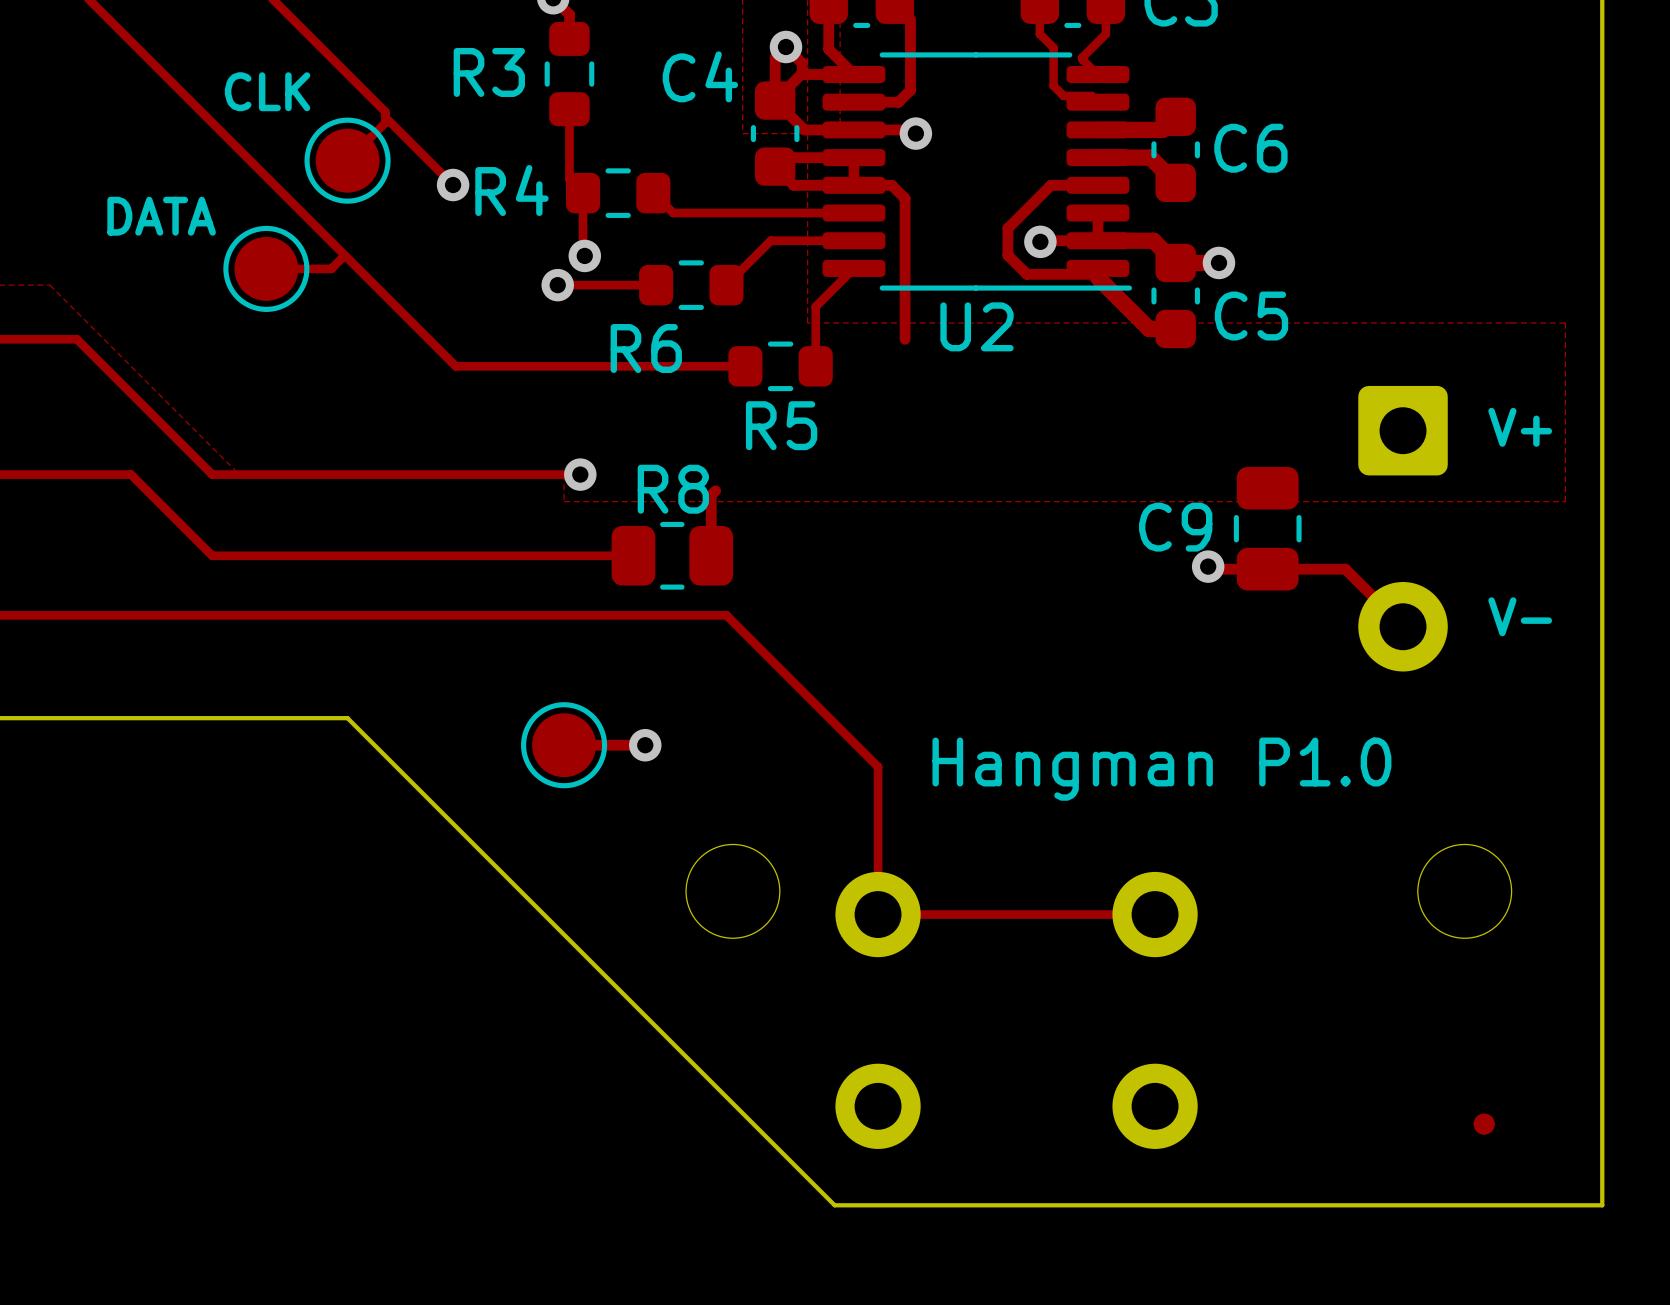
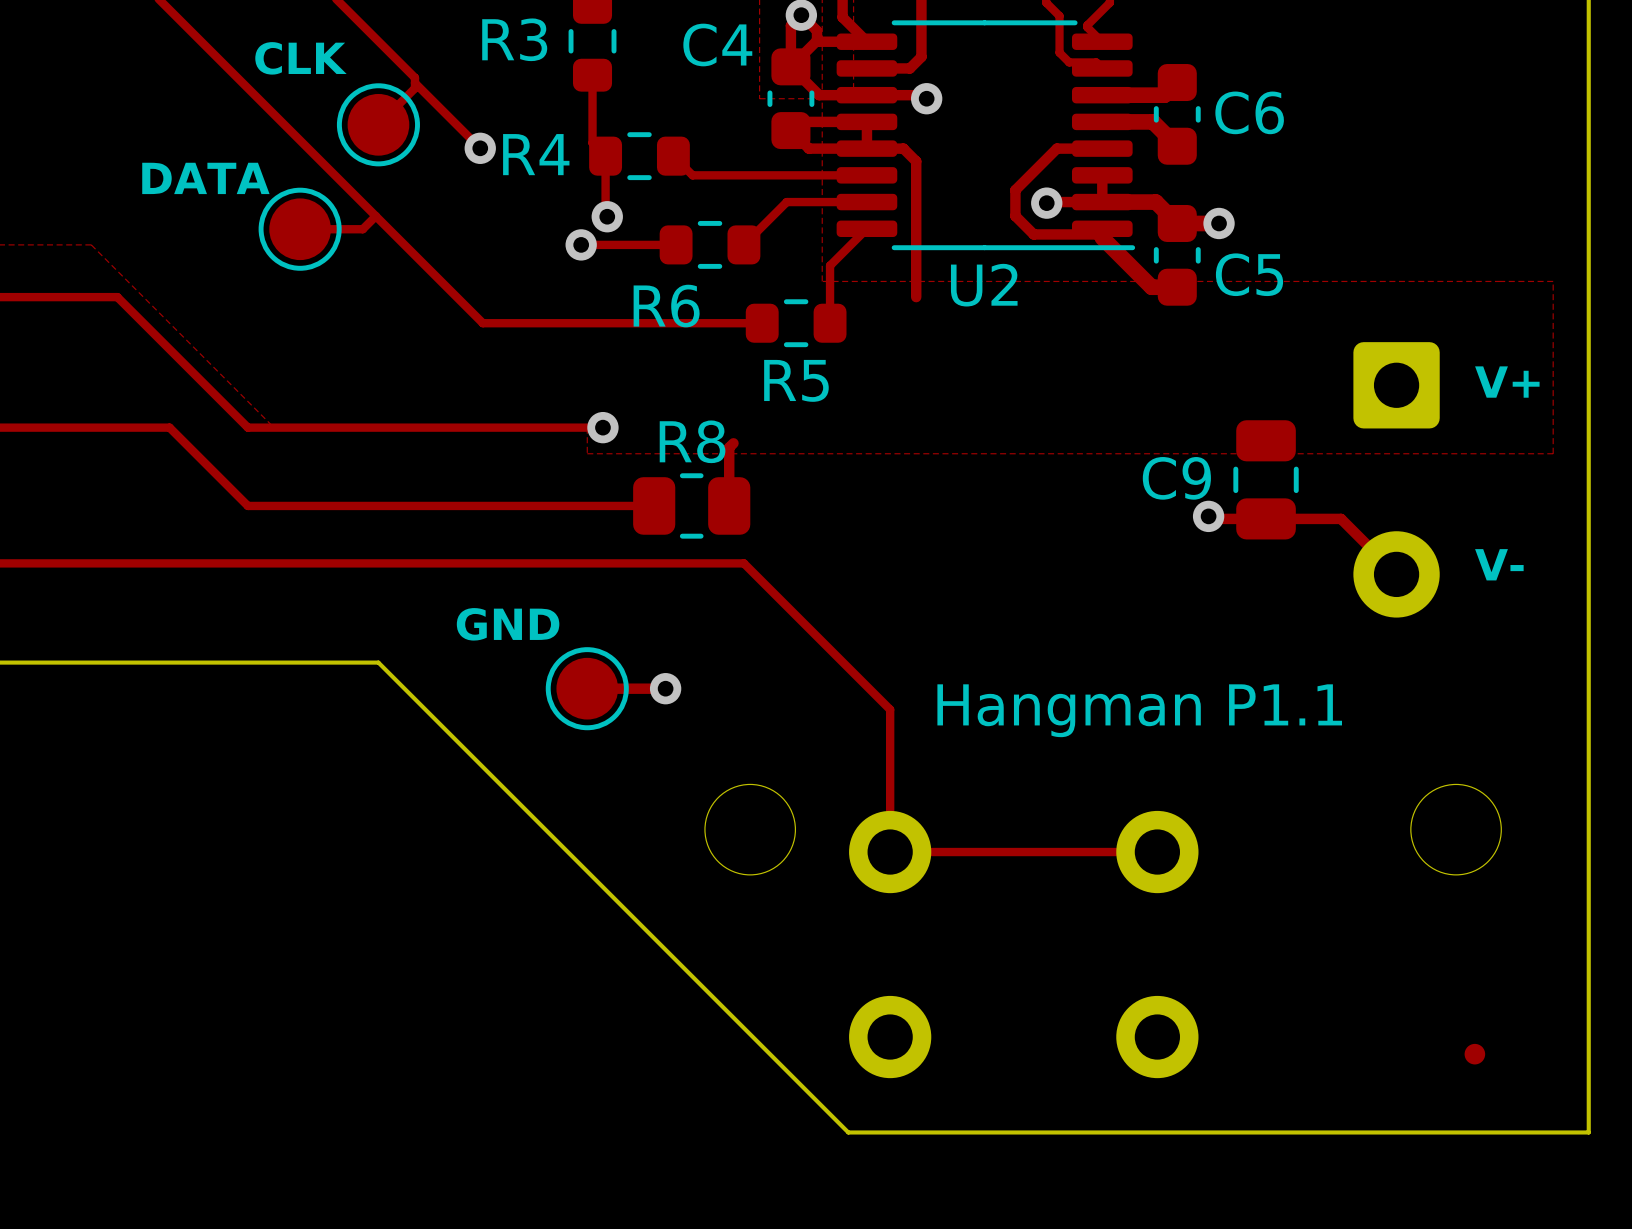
text: none -> GND (508, 624)
text: Hangman P1.0 (1161, 769) -> Hangman P1.1 (1139, 710)

